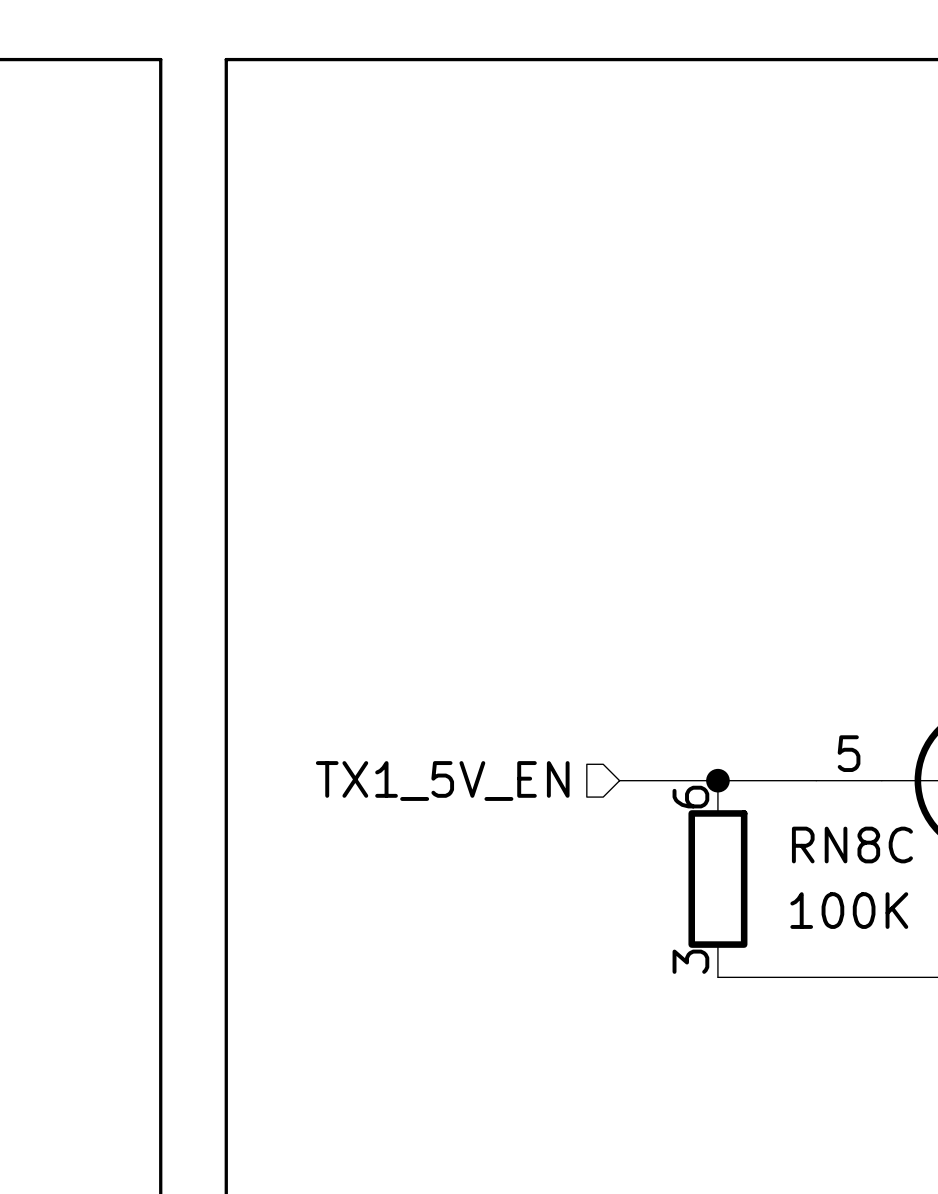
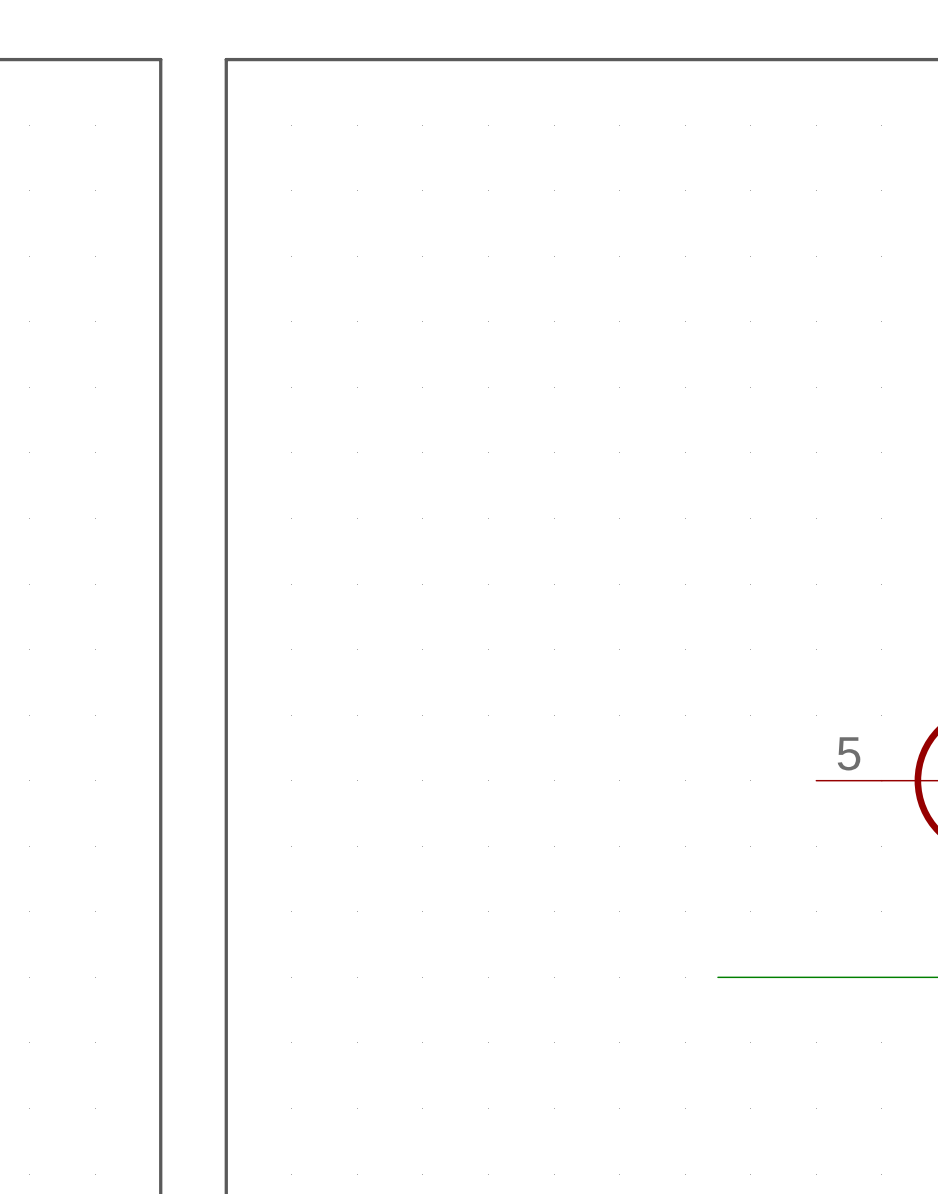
wire: (619, 780) (816, 780) -> none
junction: (717, 780) -> none
hierarchical label: TX1_5V_EN (442, 781) -> none
RN8C: 100K (717, 879) -> none

